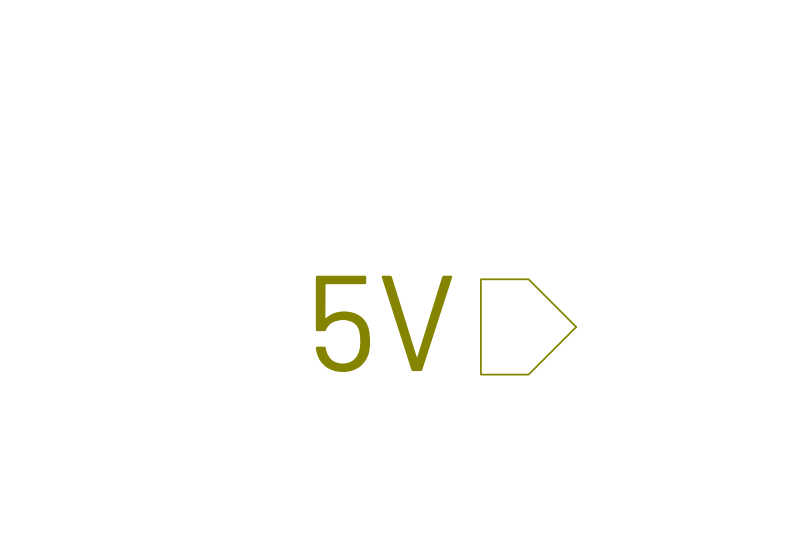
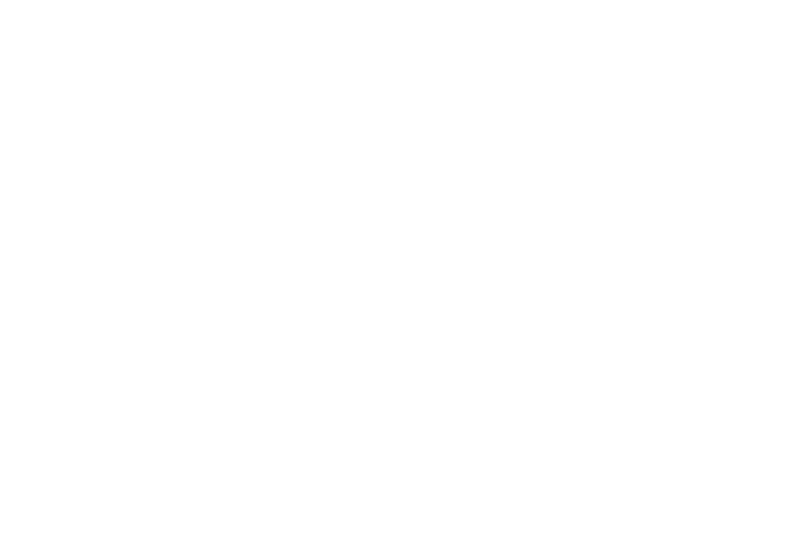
hierarchical label: 5V (384, 323) -> none

